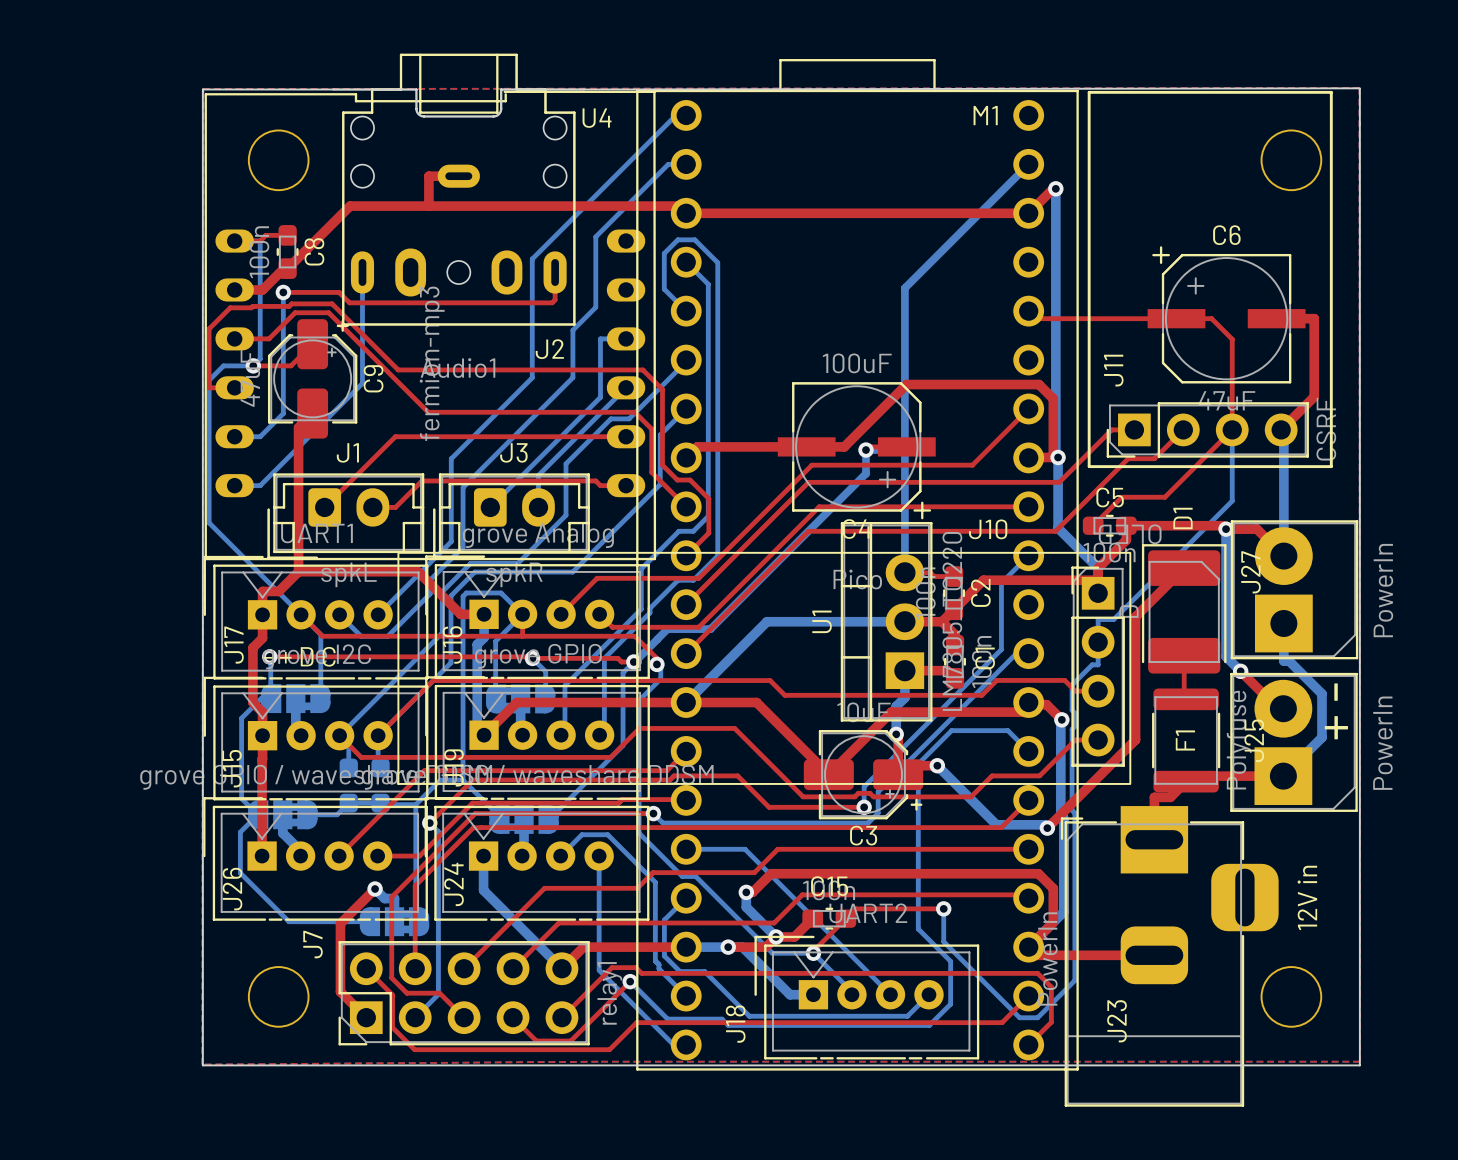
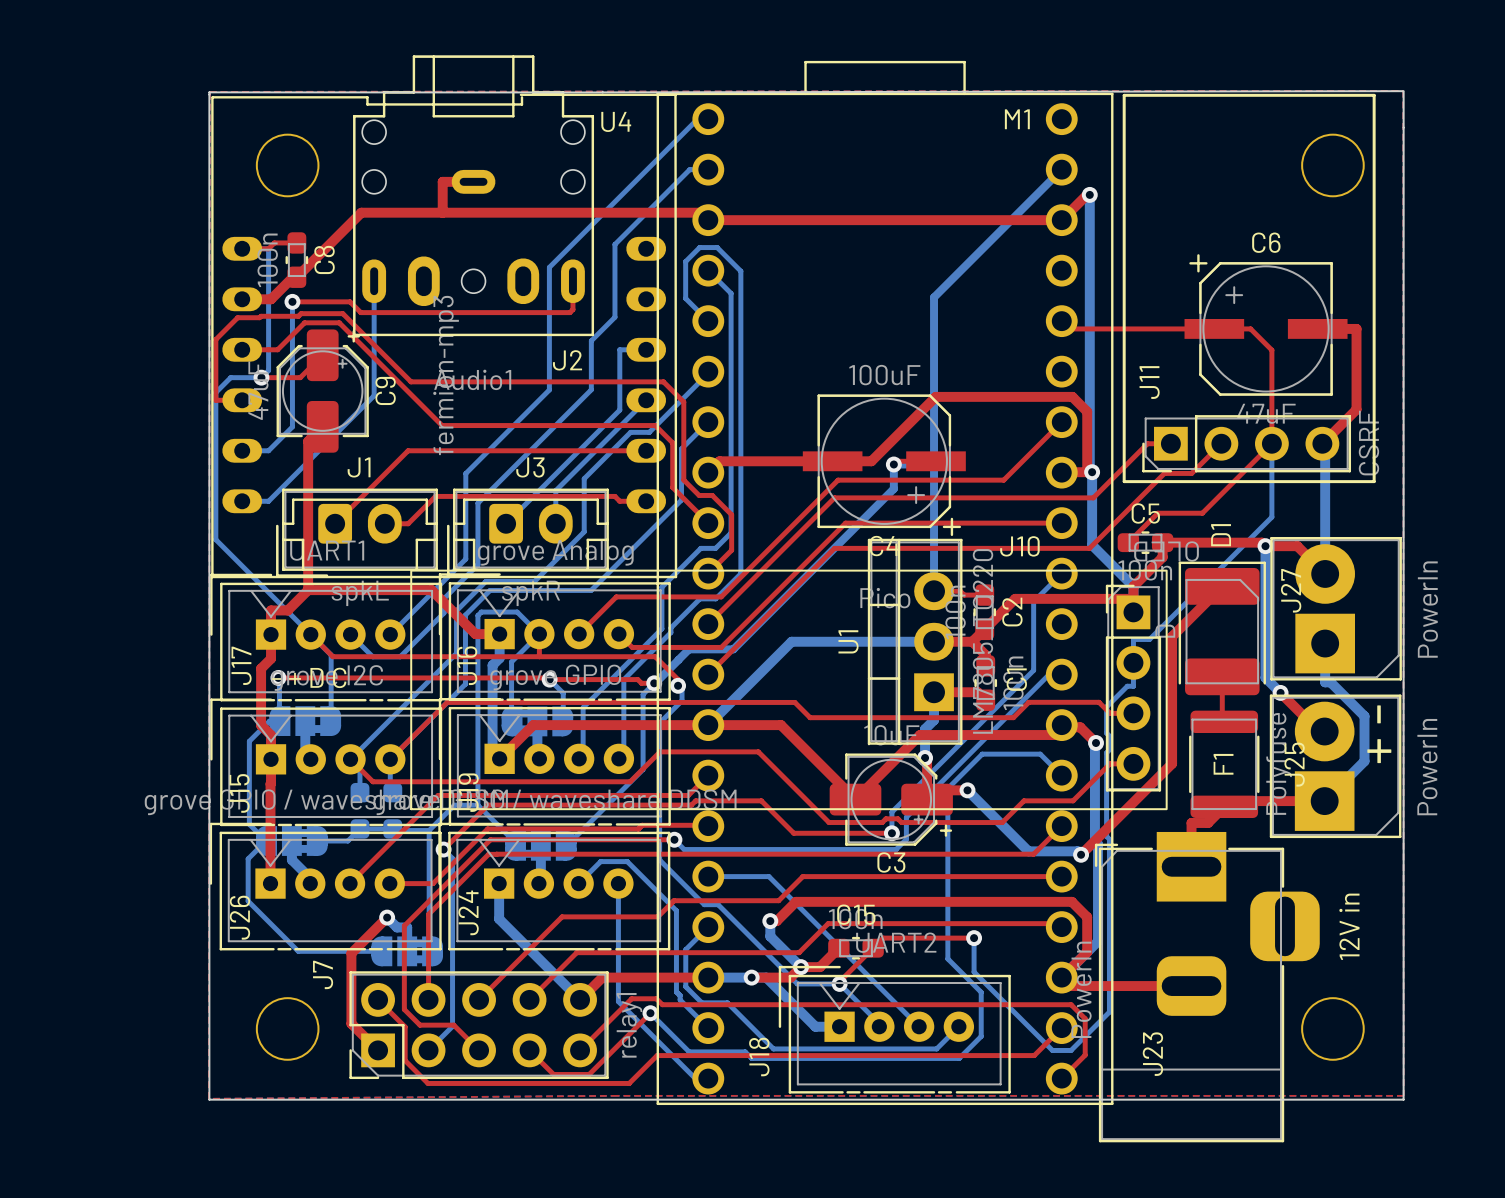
J2 footprint: [332, 53, 586, 326] -> [353, 55, 595, 337]
board edge: none -> (344, 92) (602, 92)

